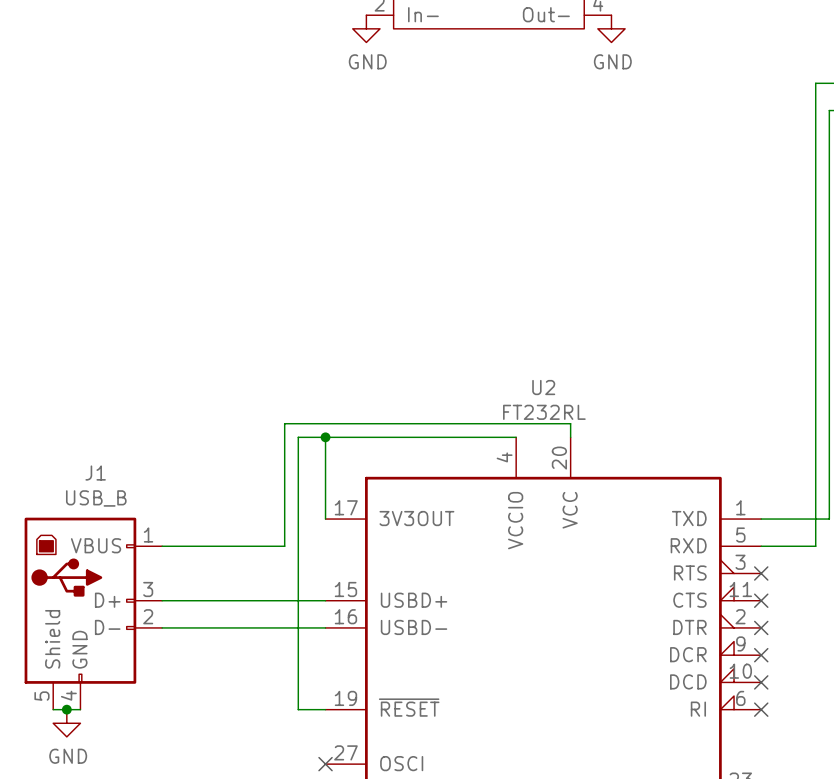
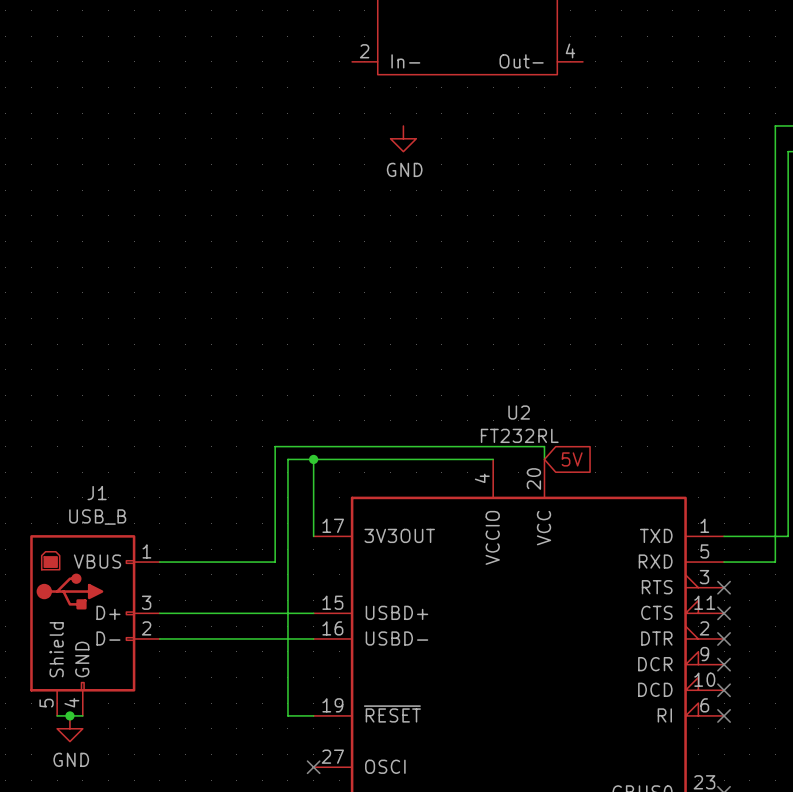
power symbol position: GND (366, 28) -> GND (403, 138)
power symbol: GND (611, 28) -> none
global label: none -> 5V (572, 459)

